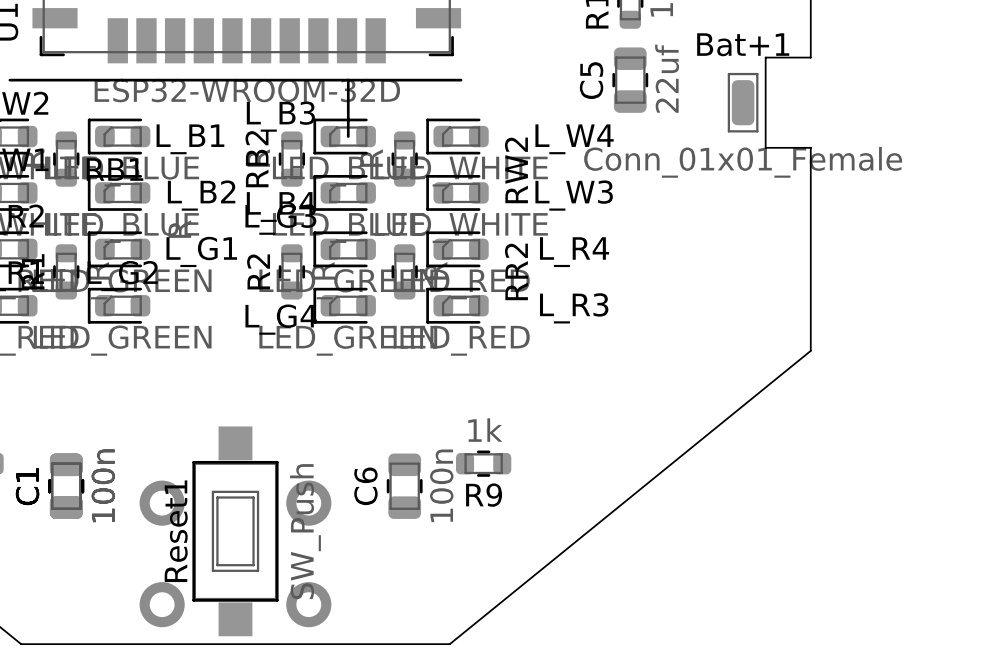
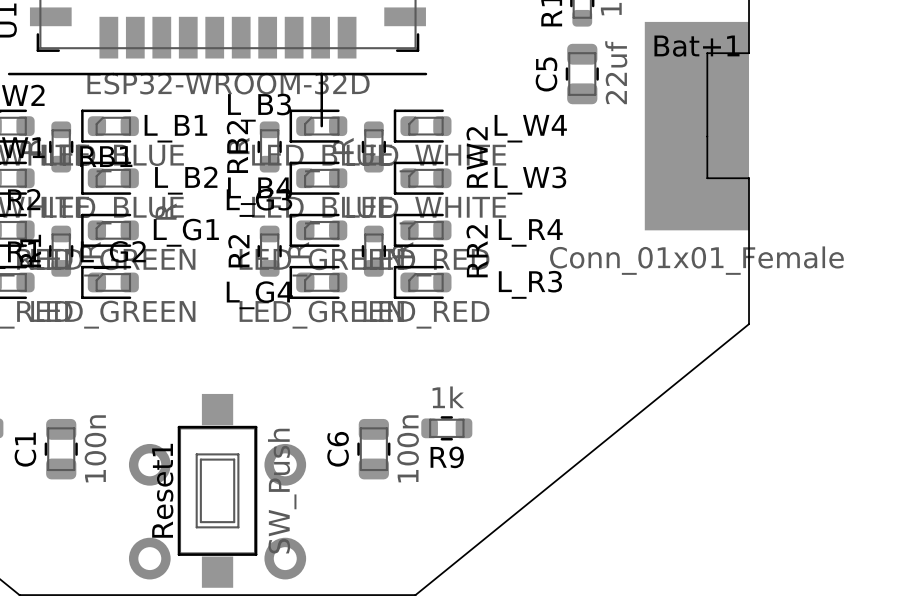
Bat+1 footprint: [727, 72, 759, 133] -> [644, 21, 750, 231]
board edge: (765, 147) (810, 147) (810, 192) -> (707, 136) (707, 178) (749, 178)
Bat+1 value position: Conn_01x01_Female (743, 162) -> Conn_01x01_Female (696, 260)
C1: 100n (66, 486) -> none

